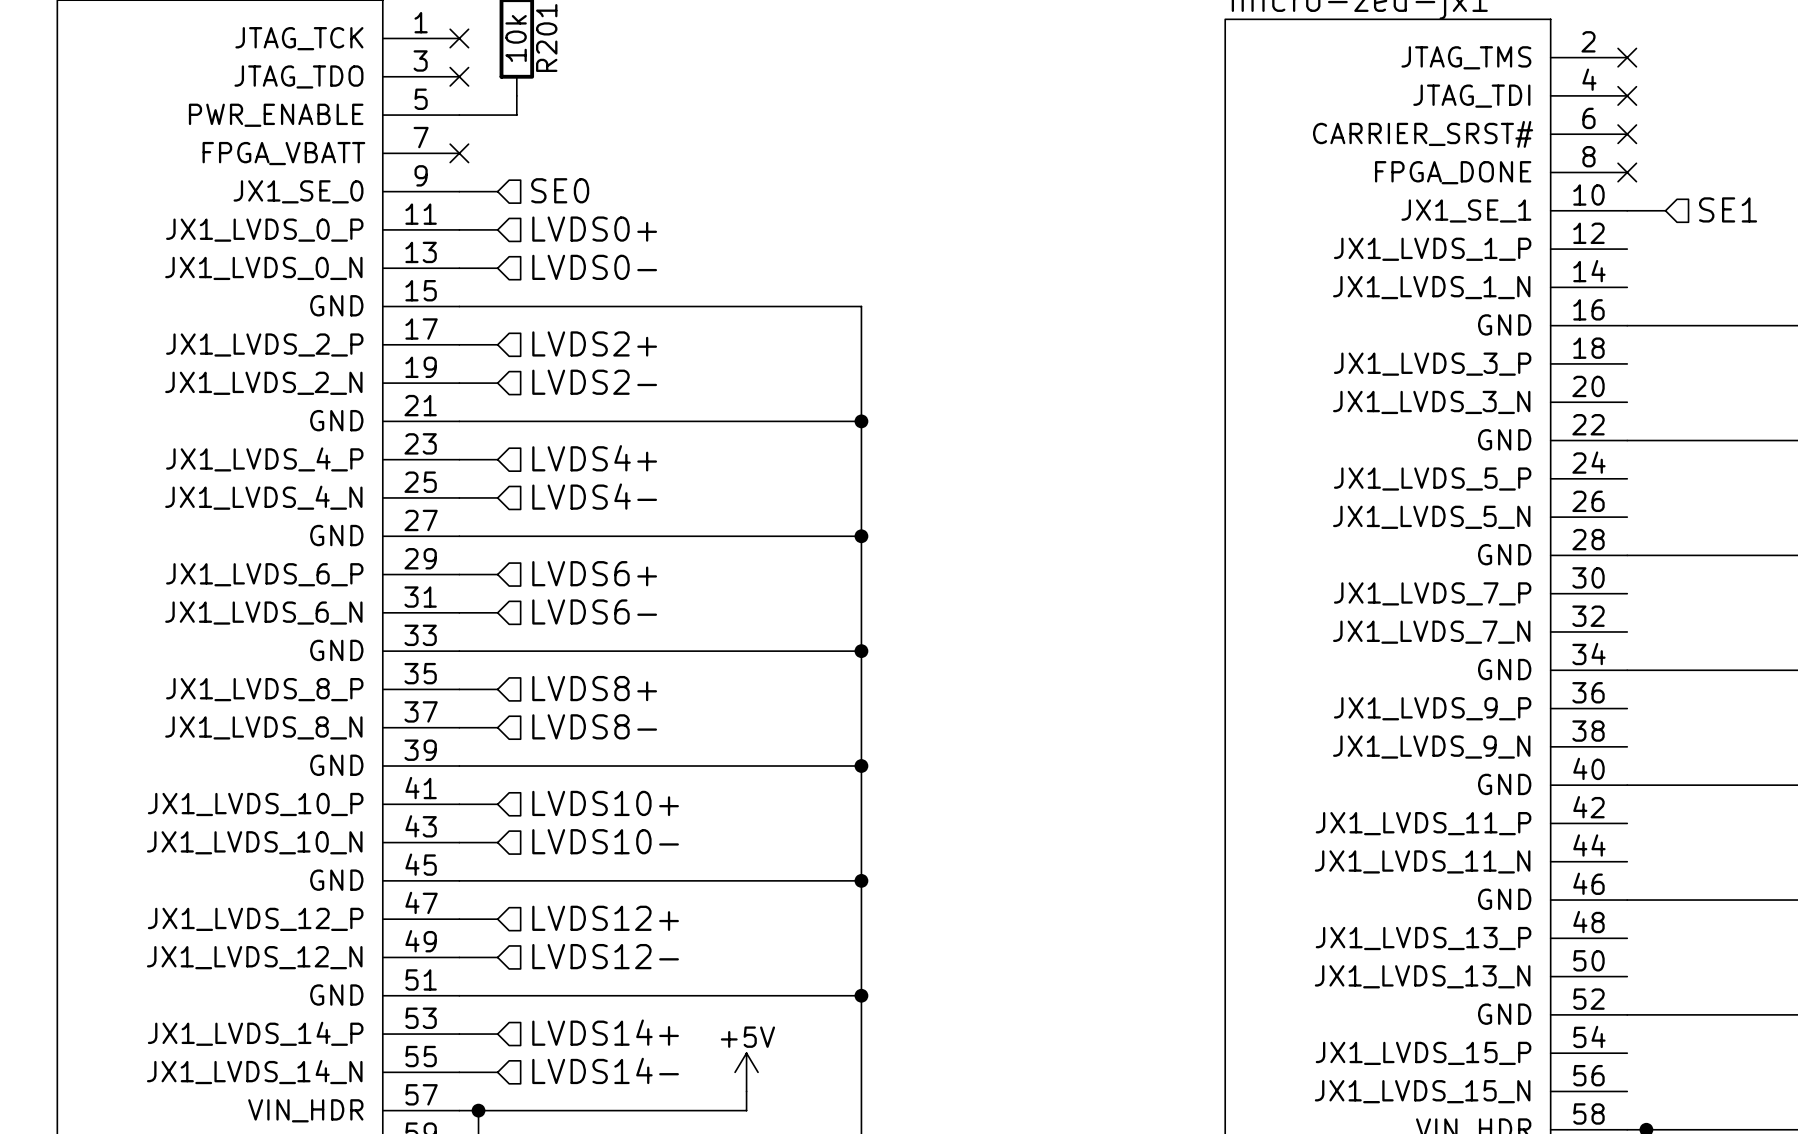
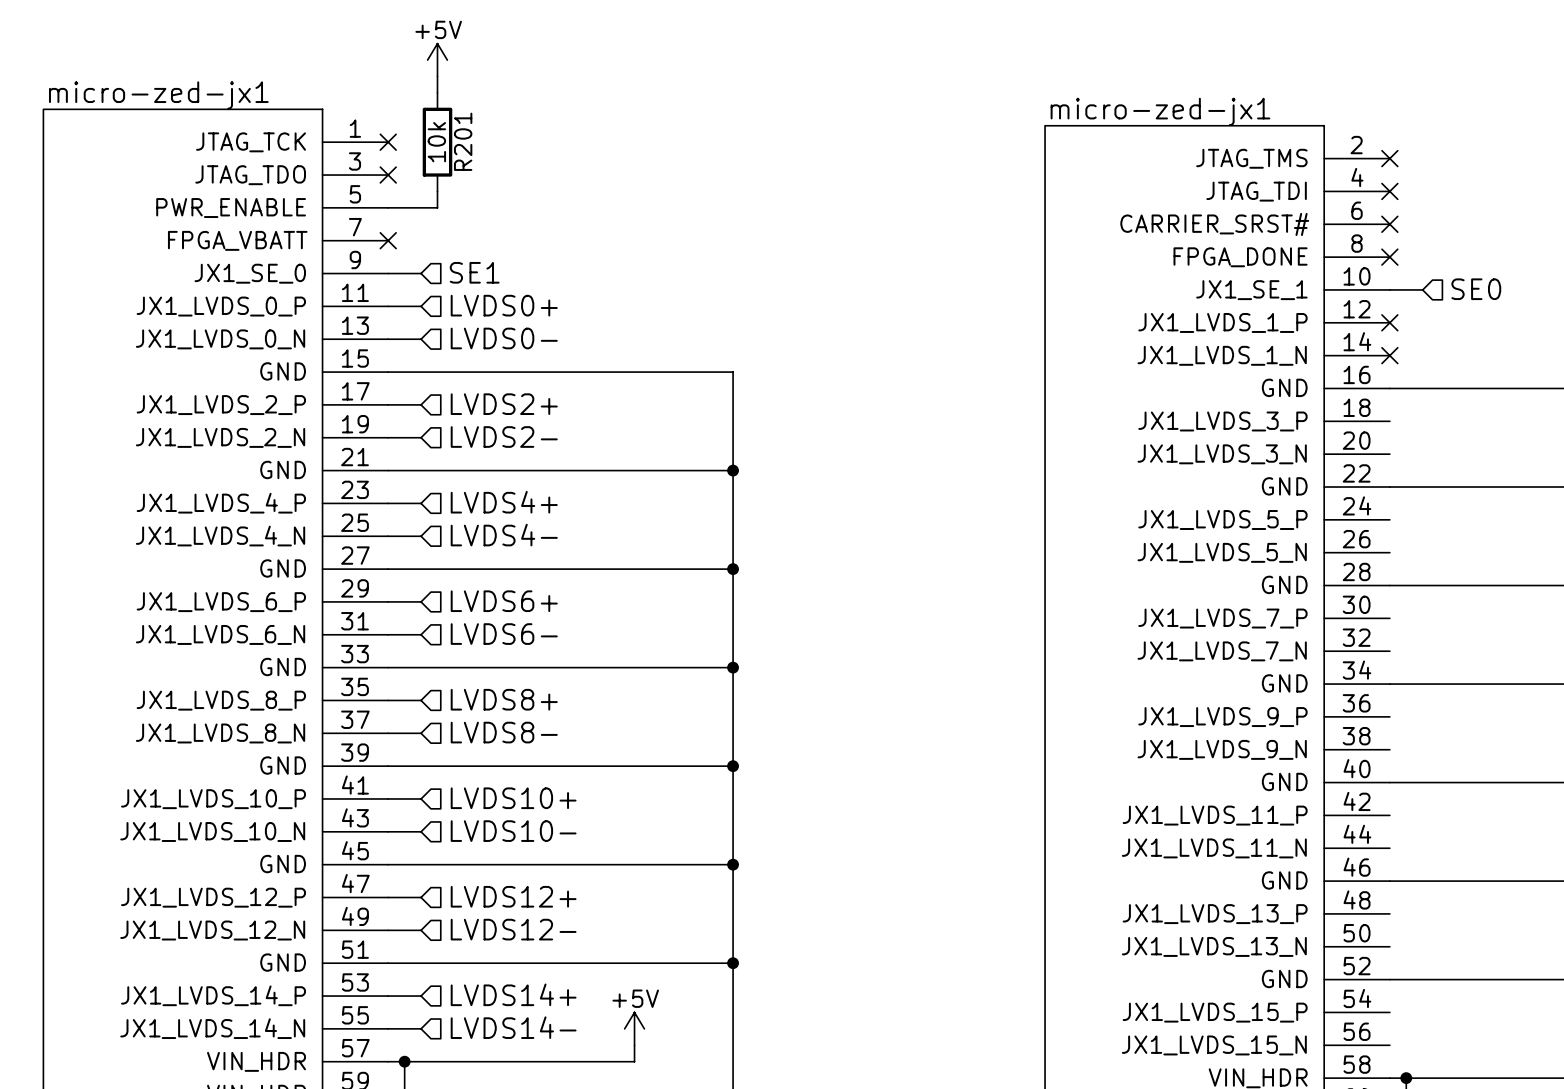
hierarchical label: SE0 (560, 190) -> SE1 (474, 272)
hierarchical label: SE1 (1728, 209) -> SE0 (1476, 289)
no-connect mark: none -> (1389, 322)
no-connect mark: none -> (1389, 355)

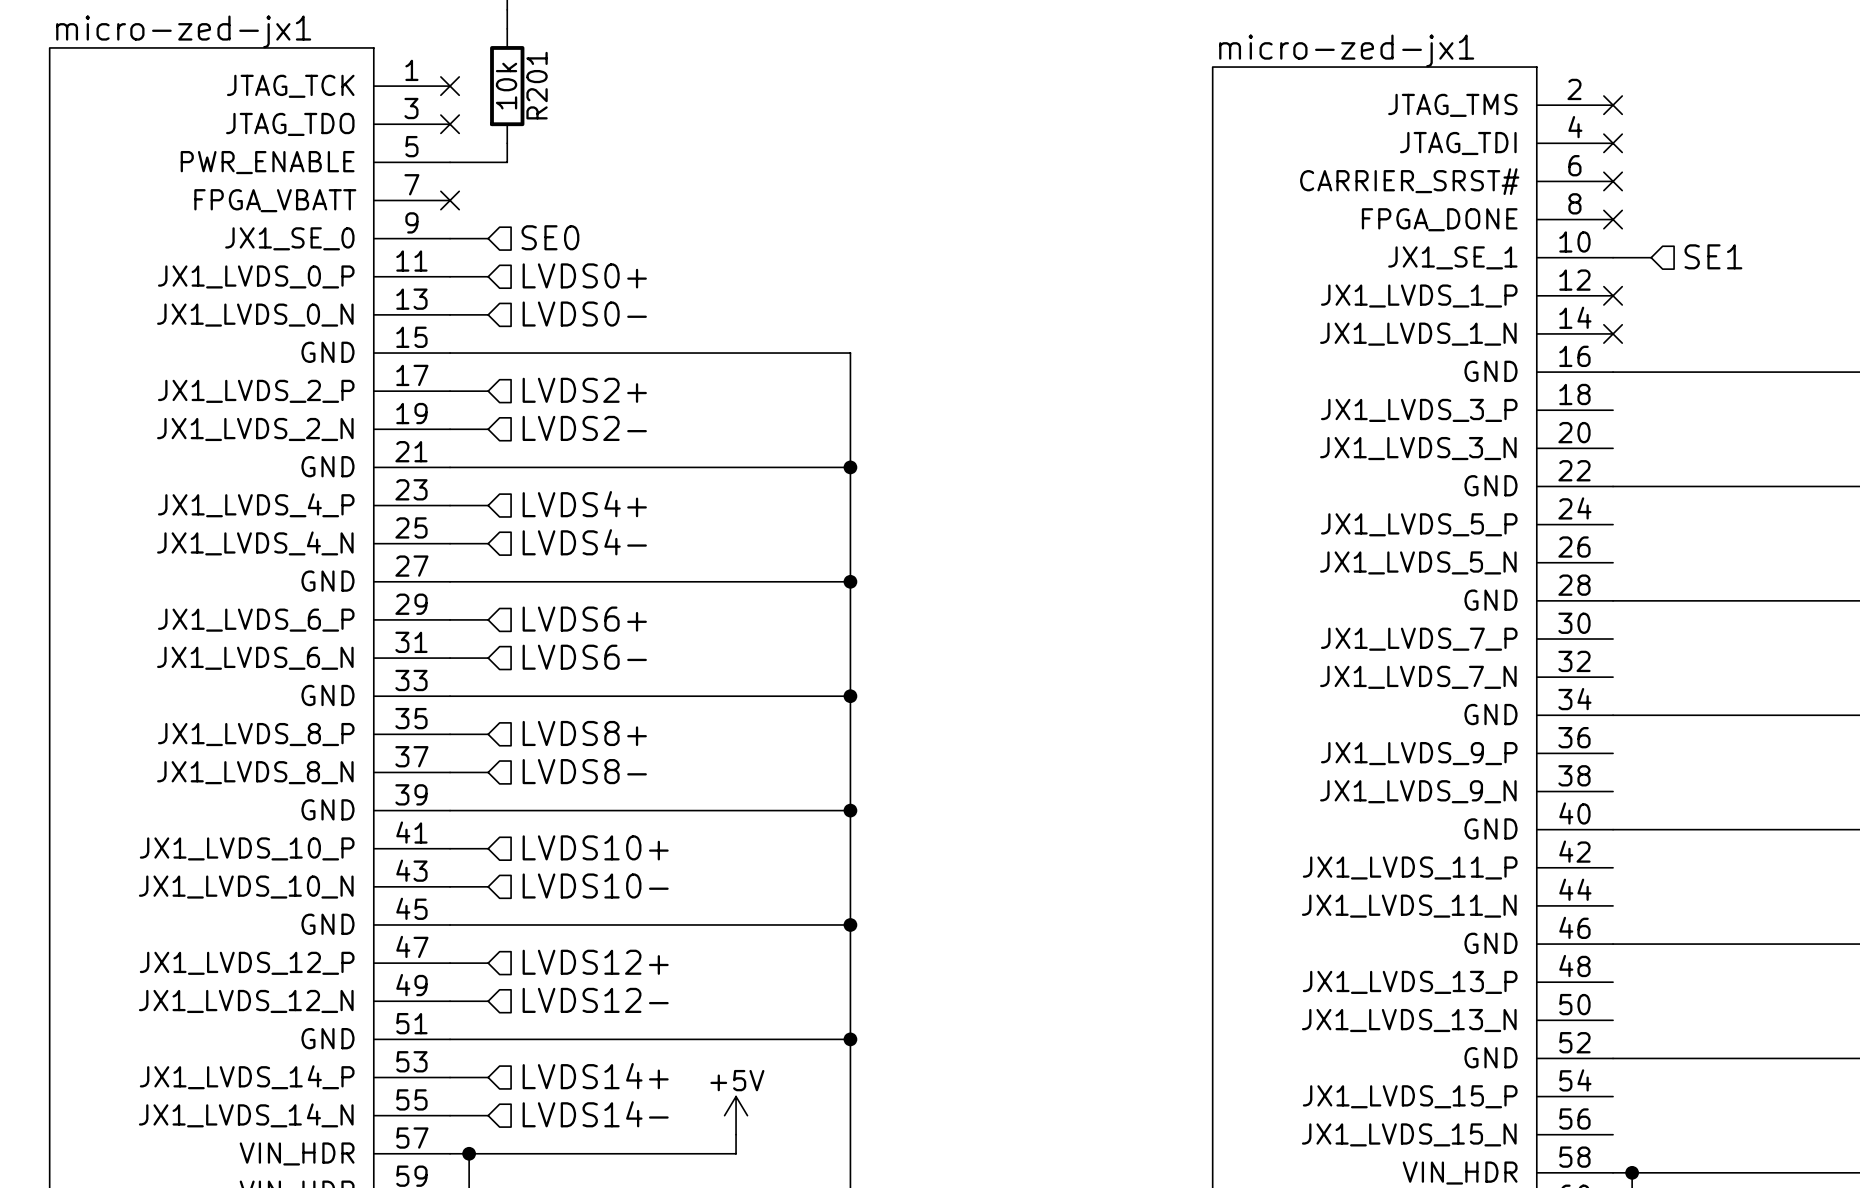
hierarchical label: SE1 (474, 272) -> SE0 (550, 237)
hierarchical label: SE0 (1476, 289) -> SE1 (1713, 256)

